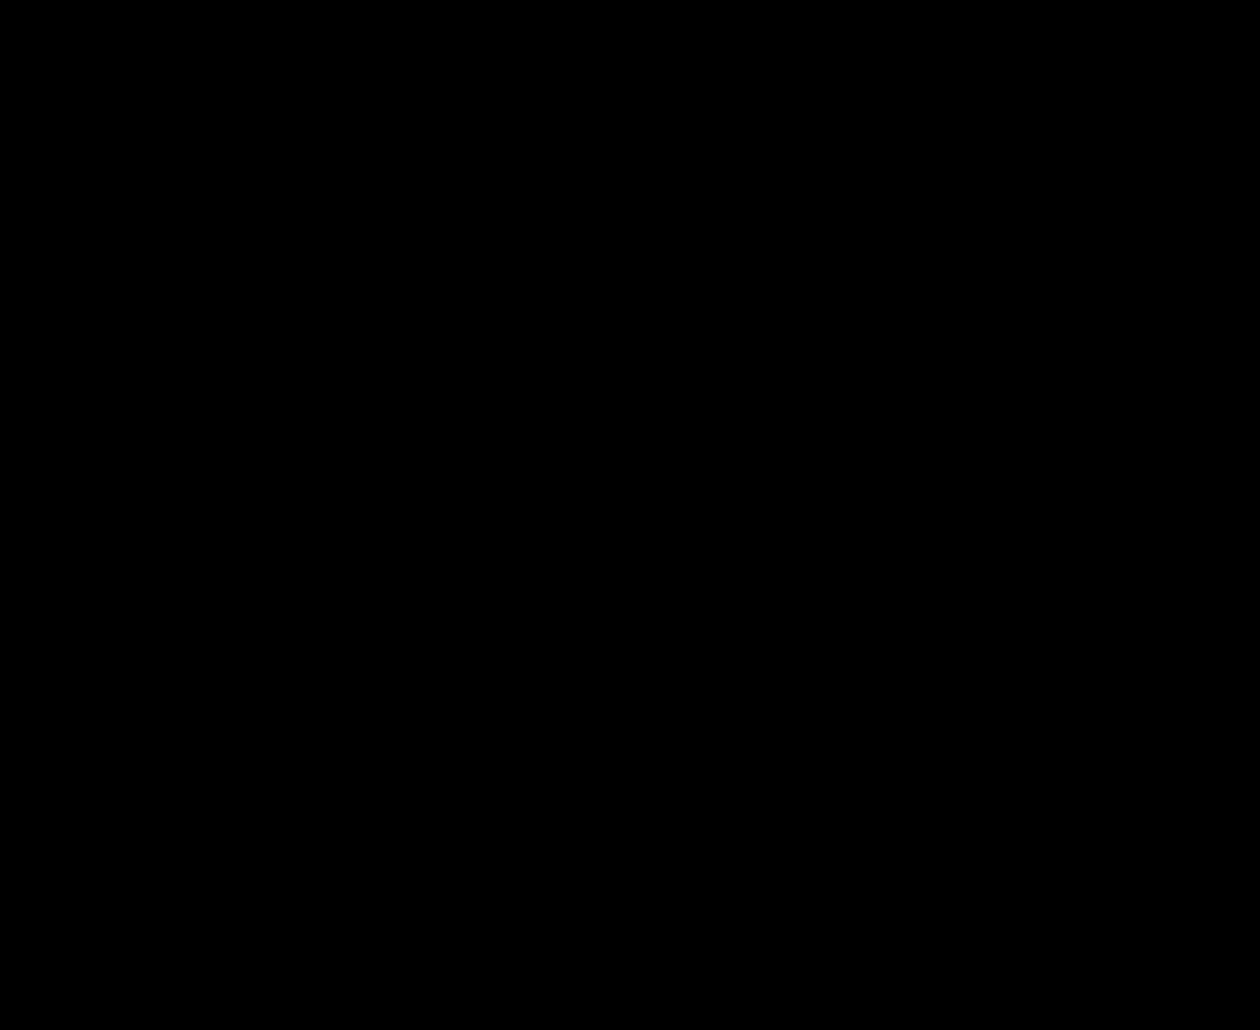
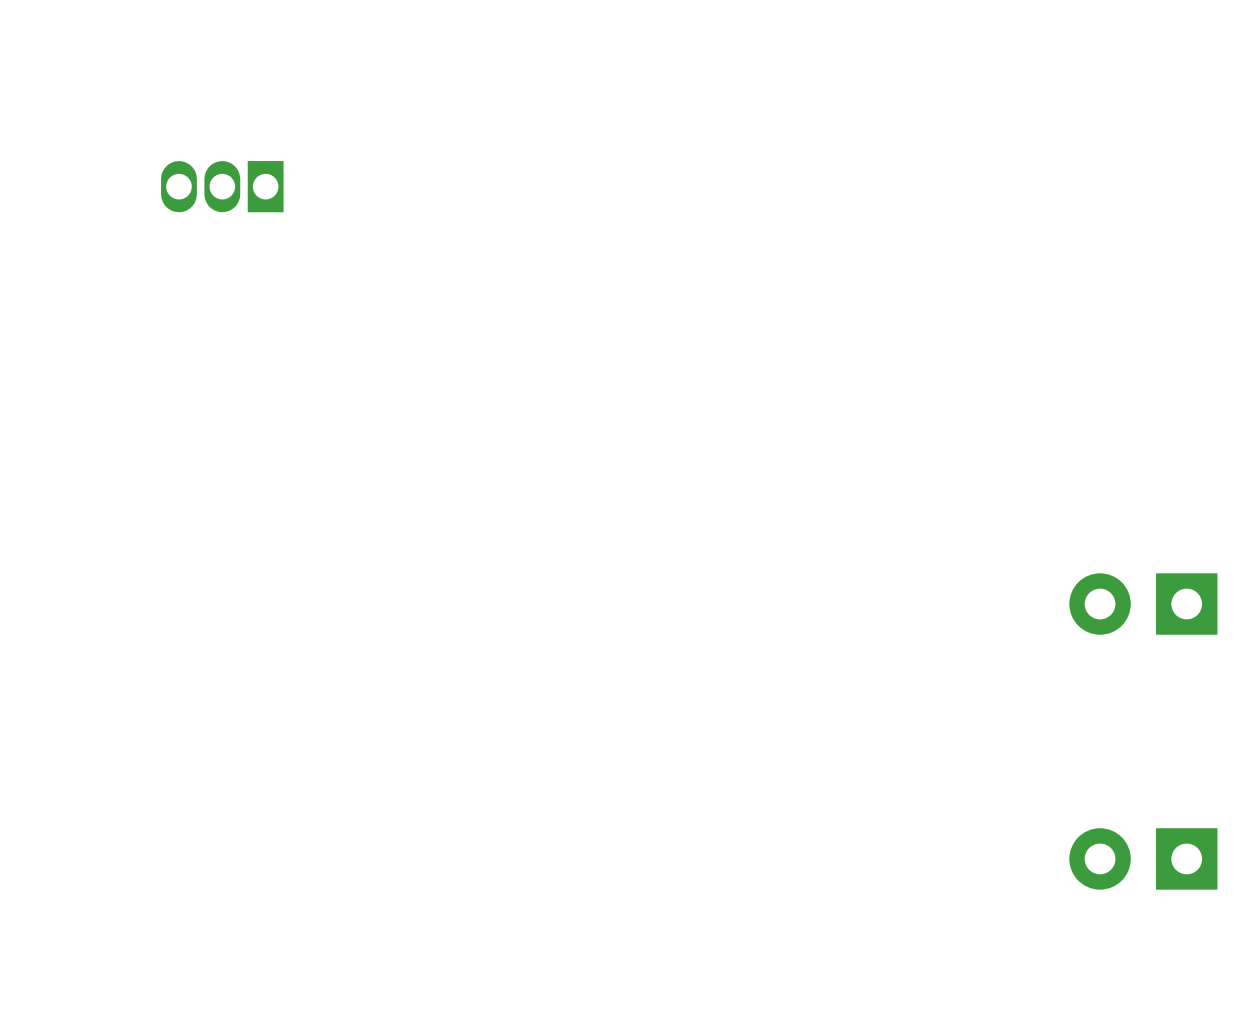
part: none -> (222, 186)
part: none -> (1143, 604)
part: none -> (1143, 858)

